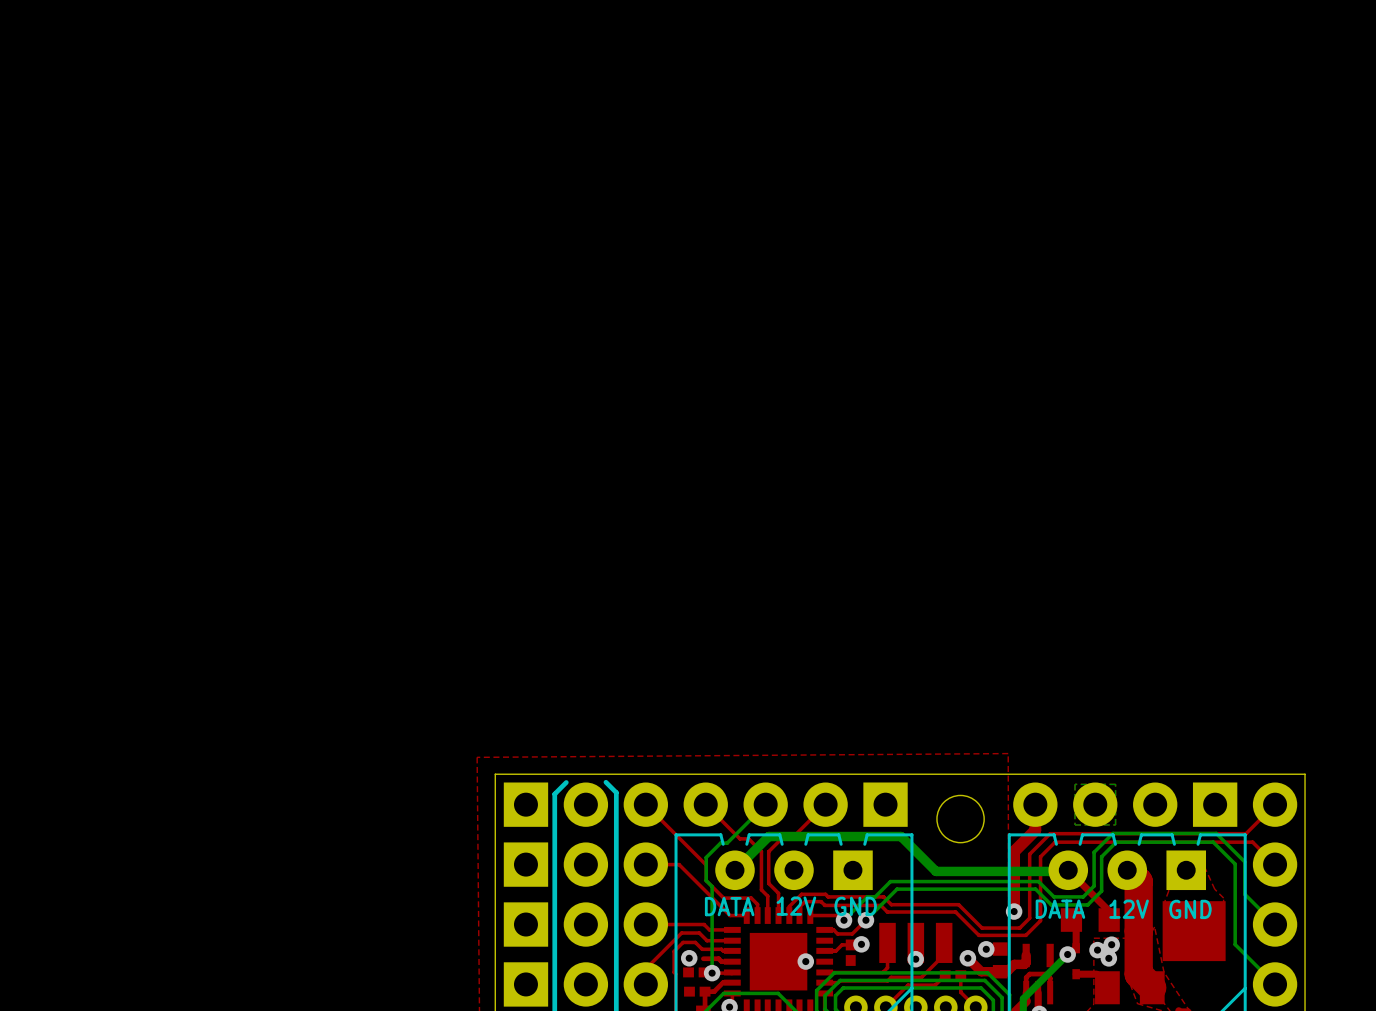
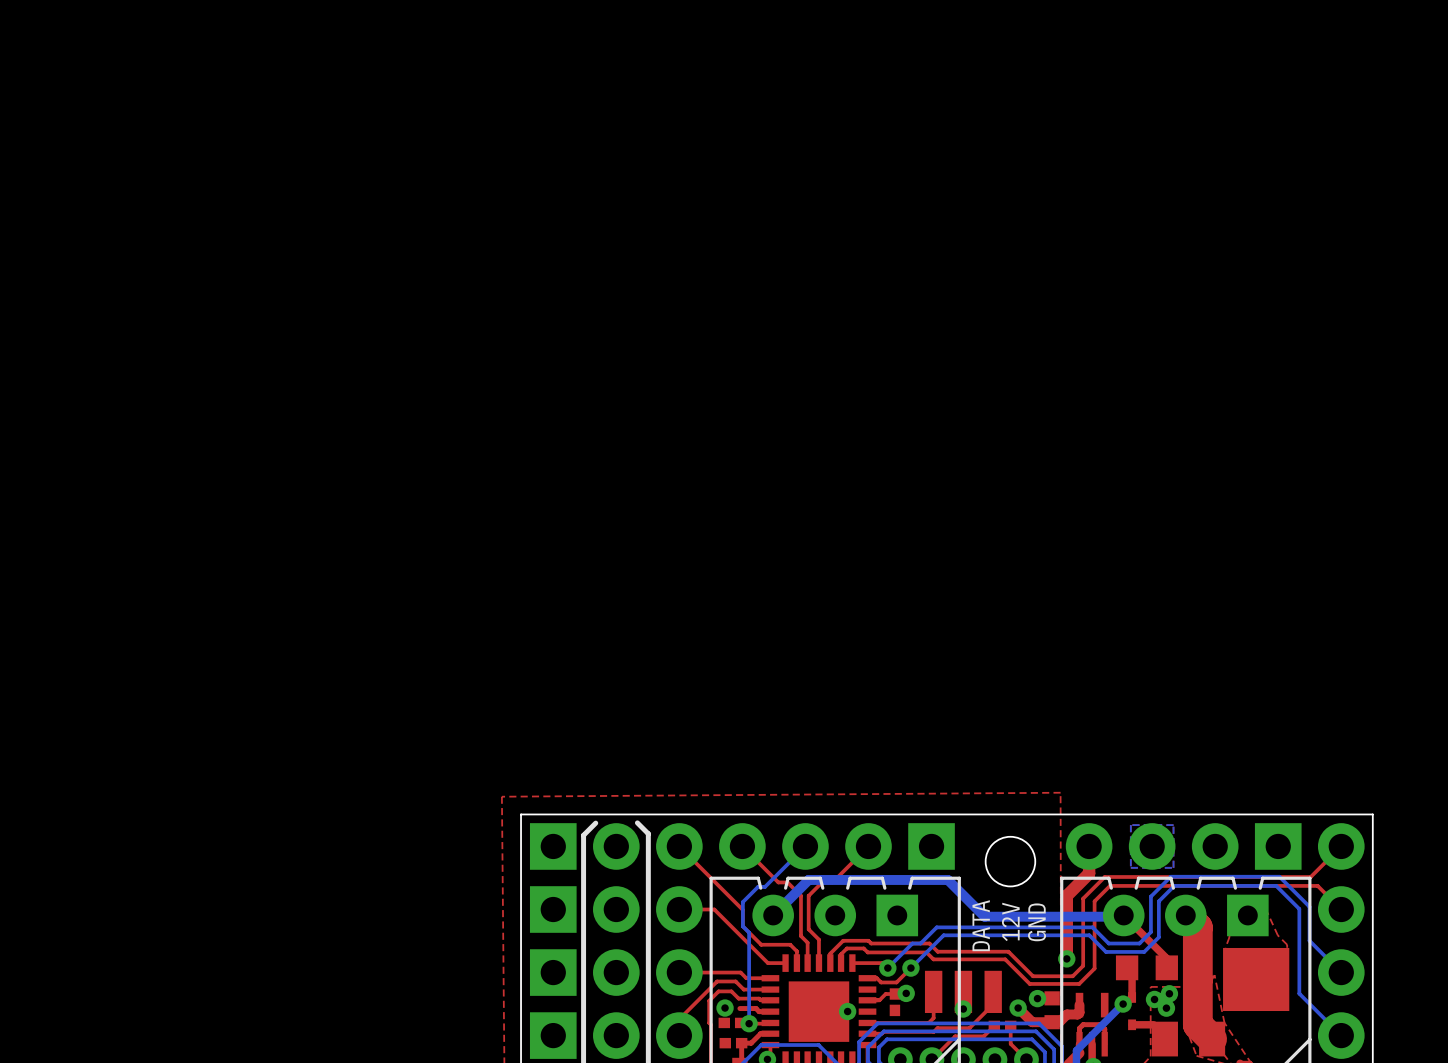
text: none -> 12V (1010, 921)
text: none -> GND (1037, 922)
text: DATA (729, 906) -> none
text: 12V (796, 906) -> none
text: GND (855, 906) -> none
text rotation: 0° (1060, 909) -> 90° counterclockwise (981, 925)
text position: DATA (1060, 909) -> DATA (981, 925)
text: 12V (1129, 909) -> none
text: GND (1190, 909) -> none

